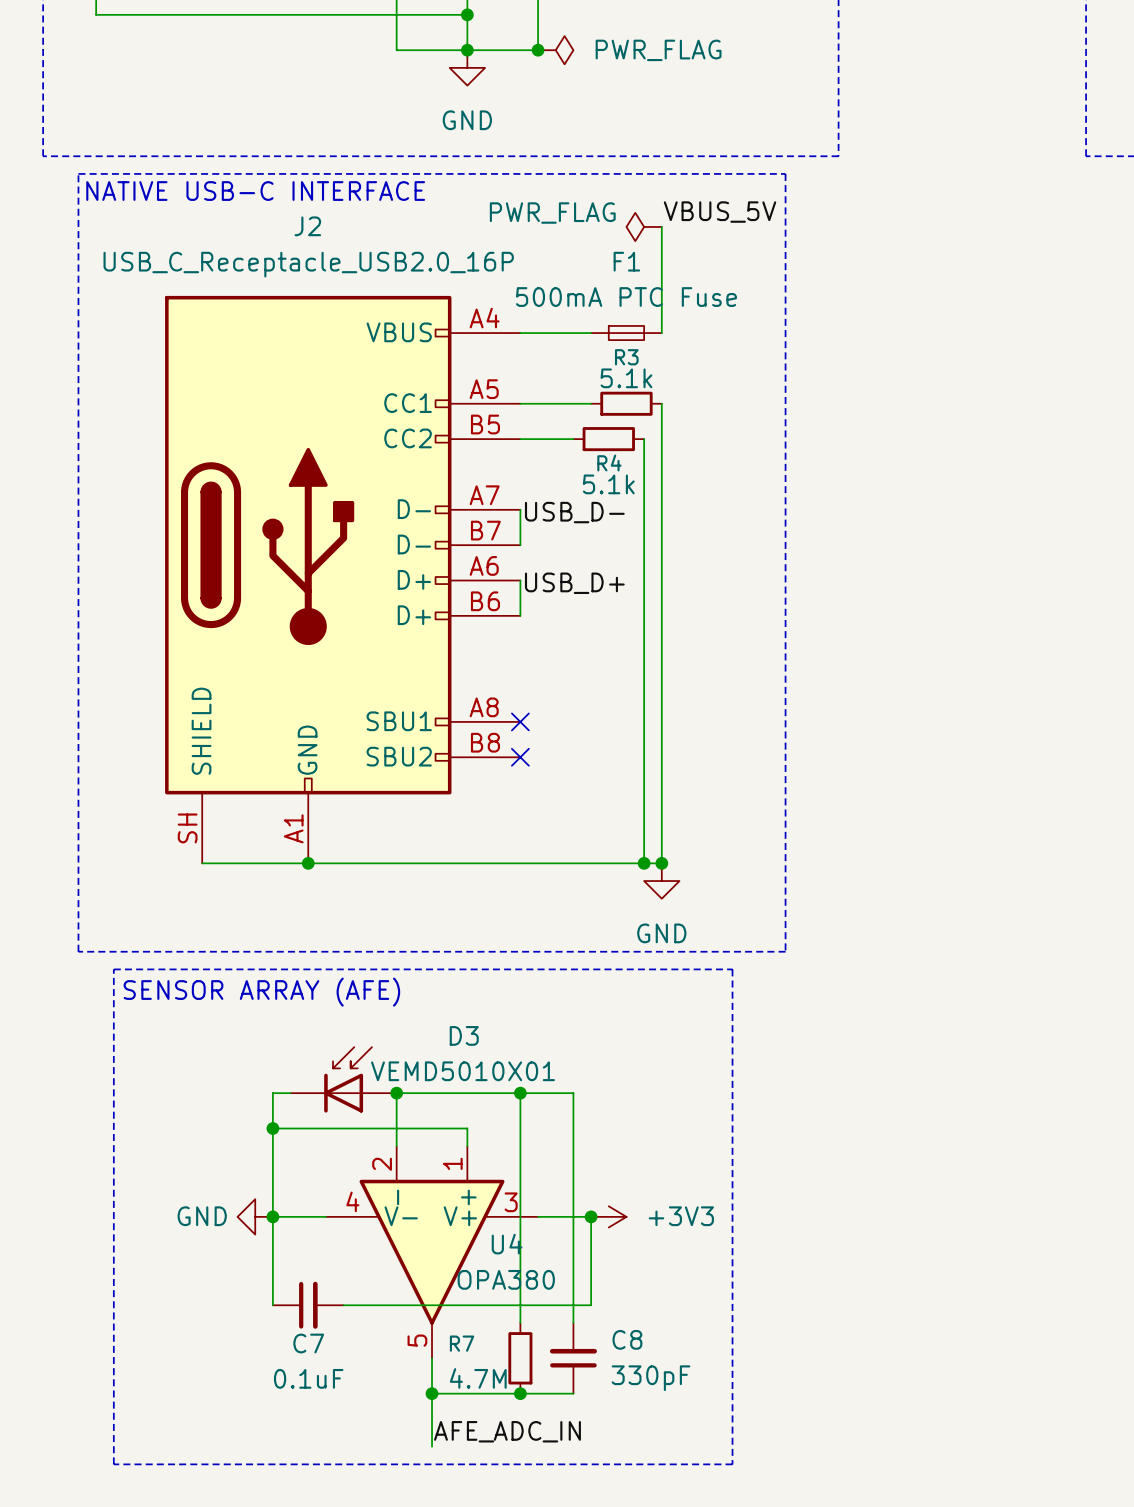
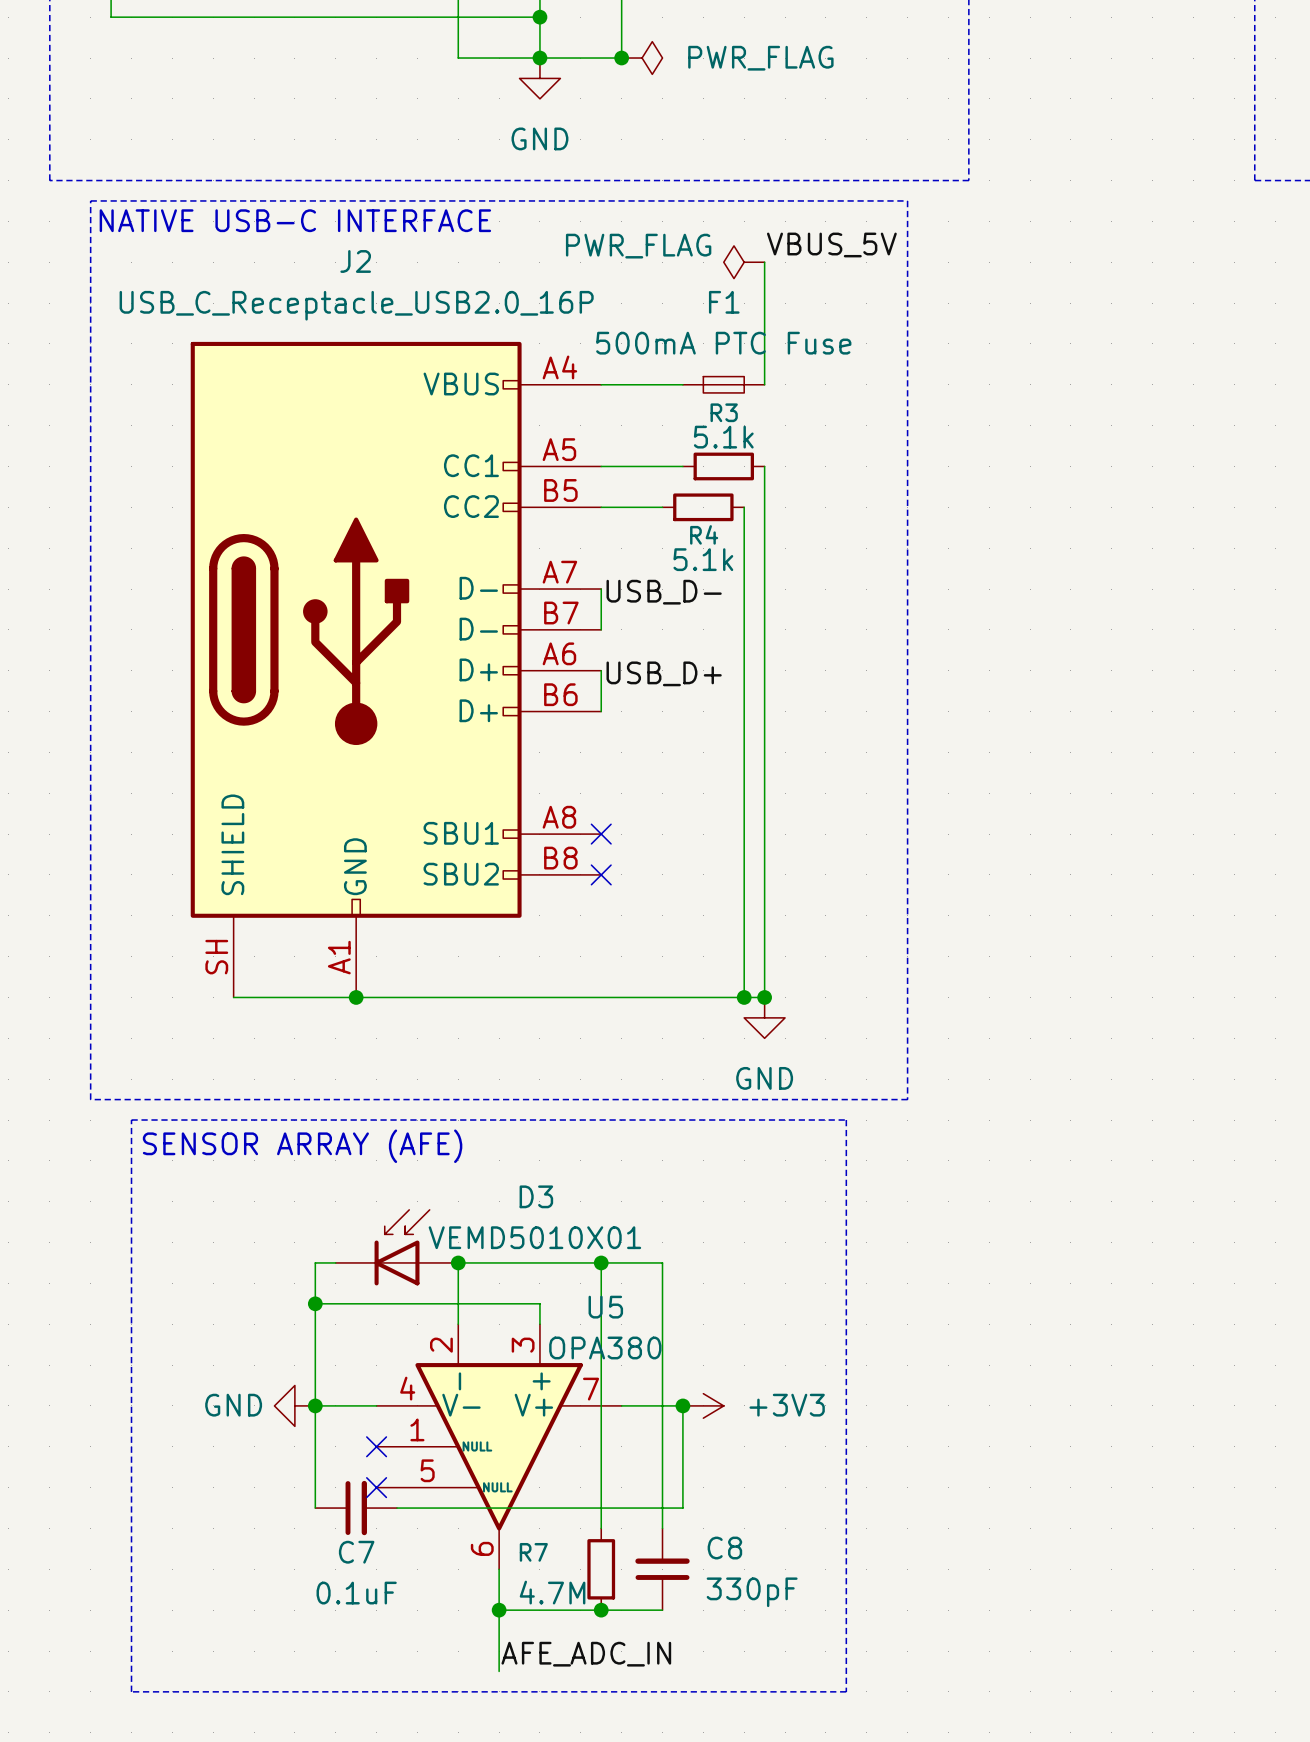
no-connect mark: none -> (376, 1446)
U4: OPA380 (432, 1252) -> none
U5: none -> OPA380 (499, 1446)
no-connect mark: none -> (376, 1487)

